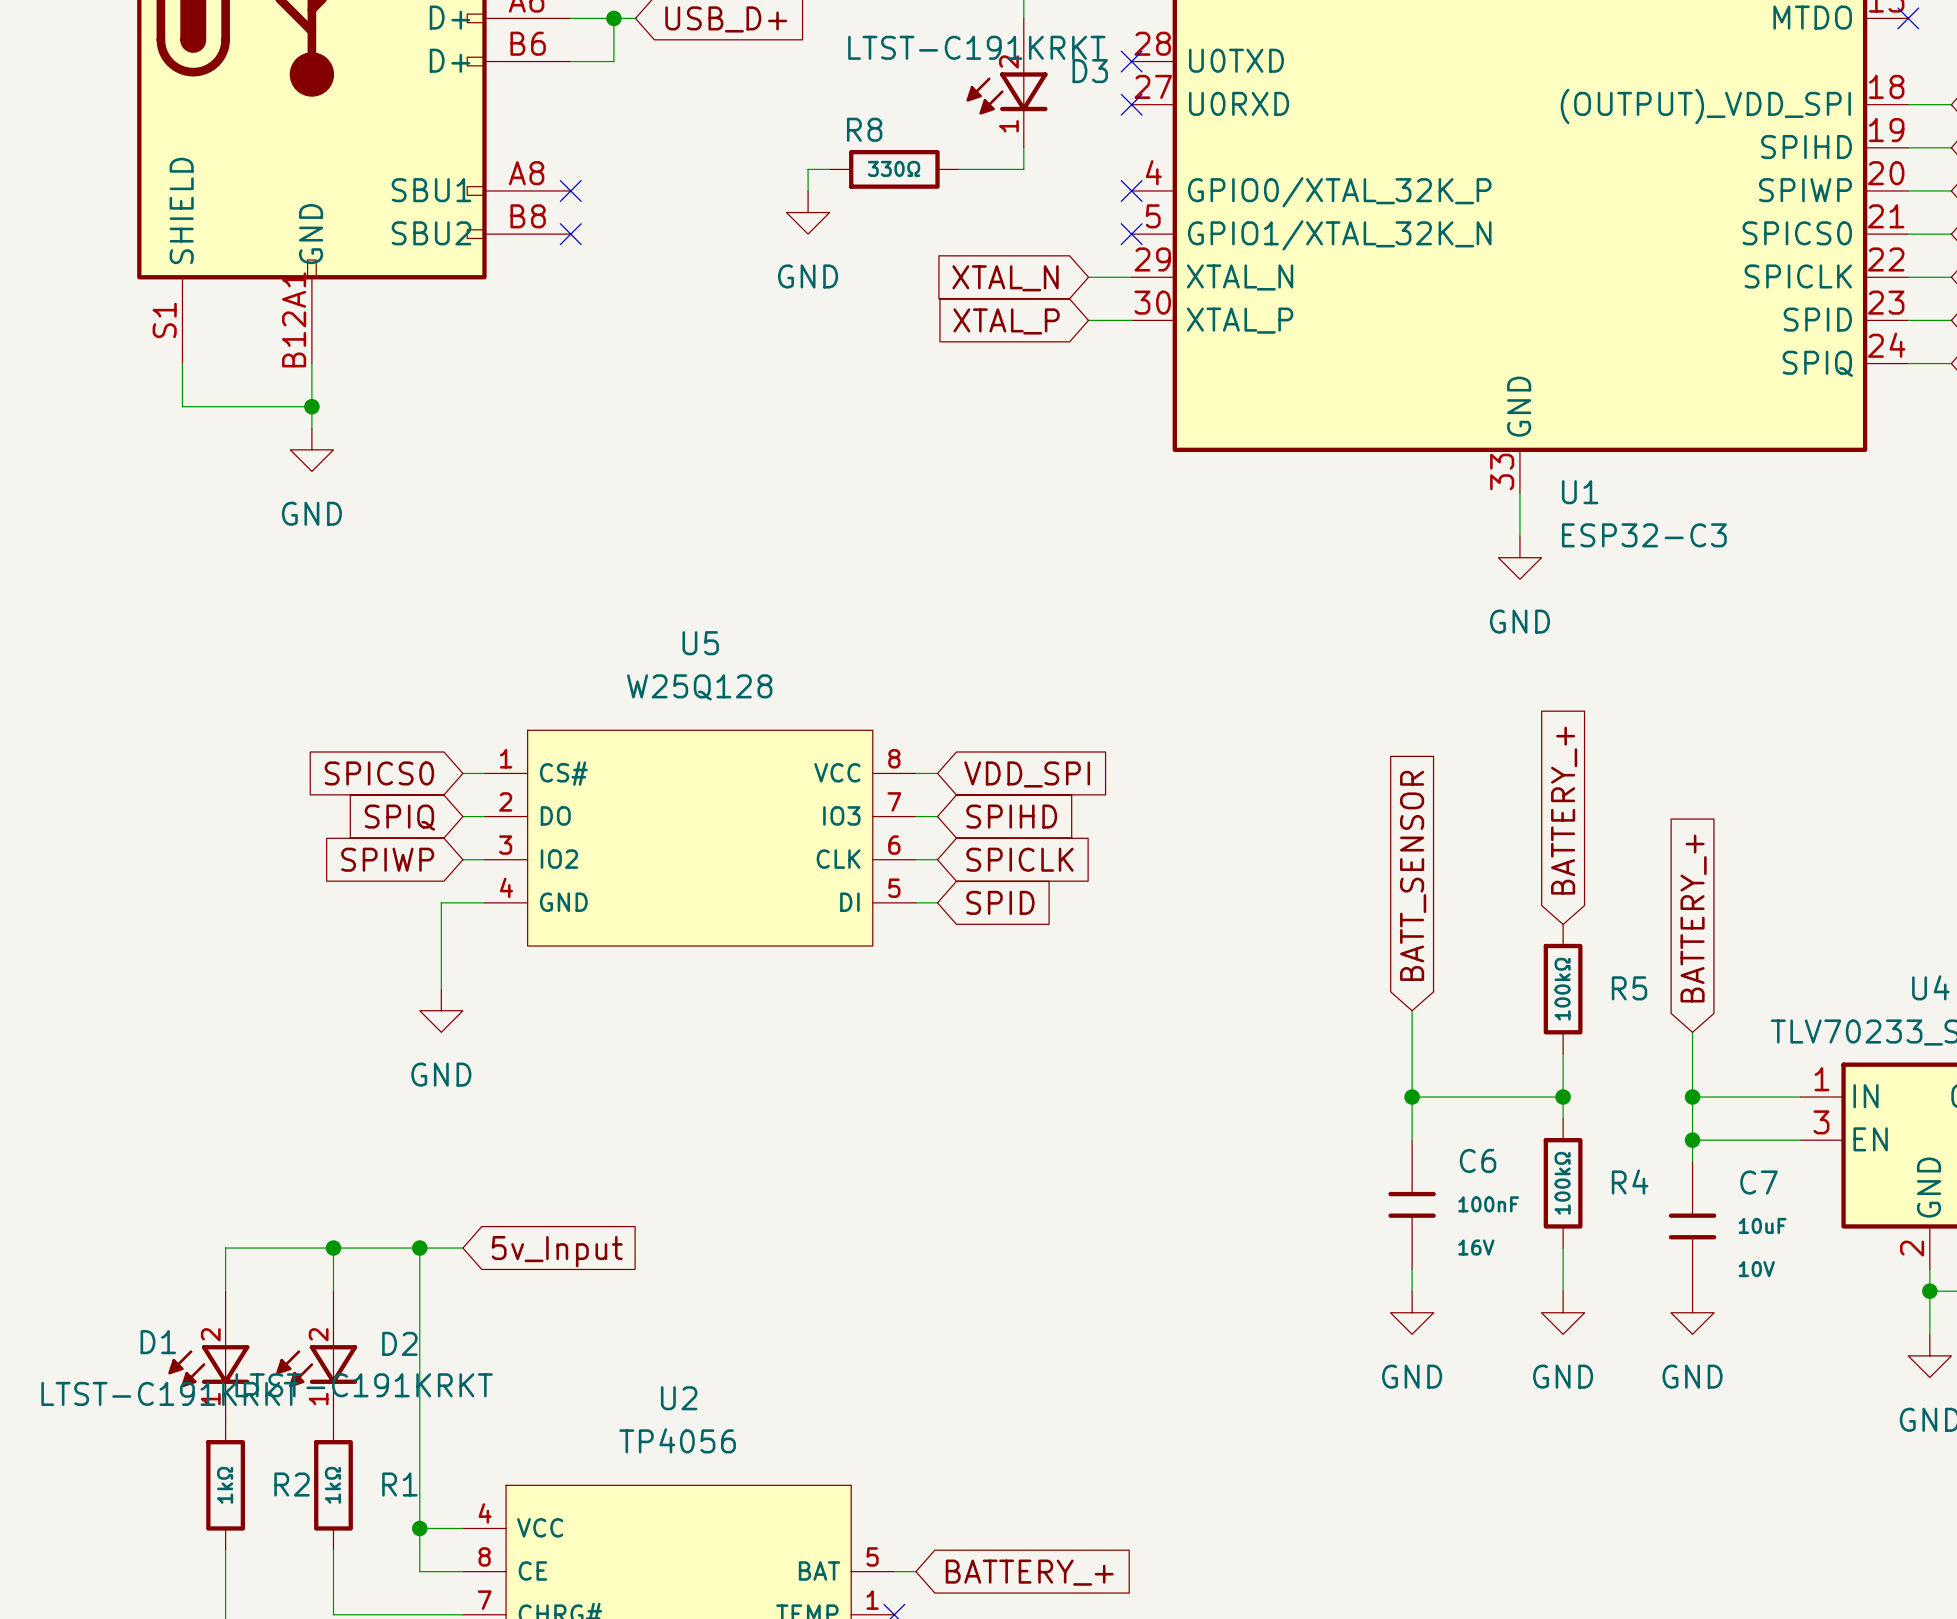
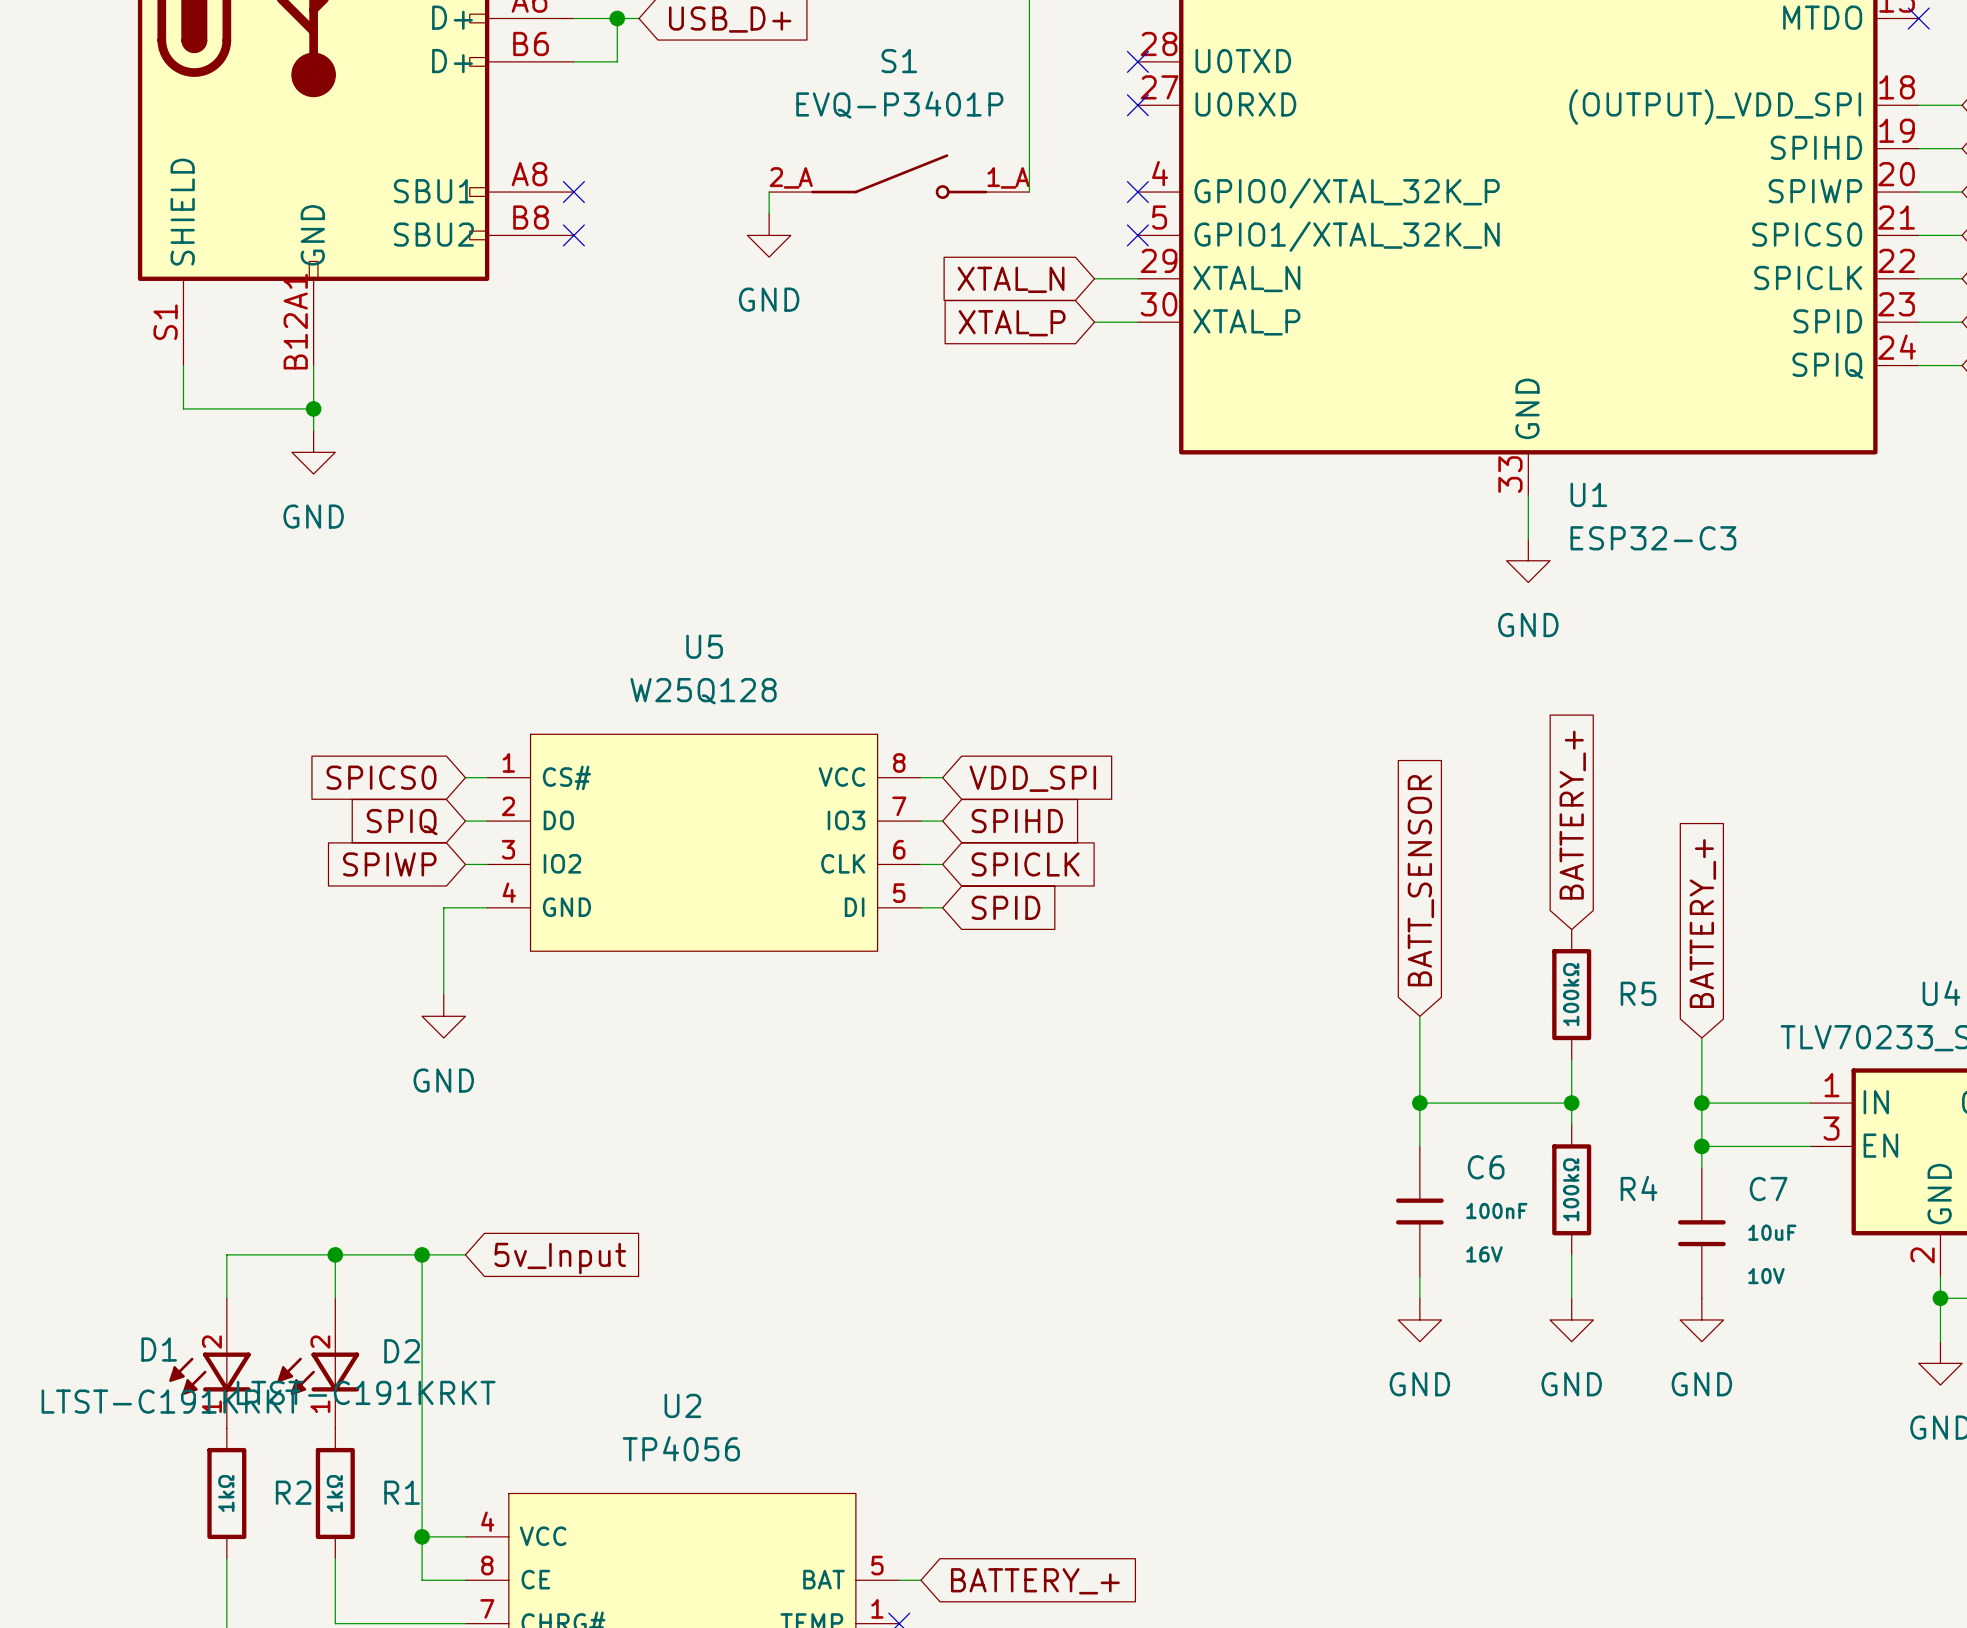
D3: LTST-C191KRKT (1006, 83) -> none
wire: (829, 169) (808, 169) (808, 190) -> none
R8: 330Ω (894, 169) -> none
wire: (959, 169) (1023, 169) -> (1029, 192) (1029, 170)
S1: none -> EVQ-P3401P (899, 176)
wire: none -> (769, 192) (769, 213)
power symbol position: GND (808, 212) -> GND (769, 235)

